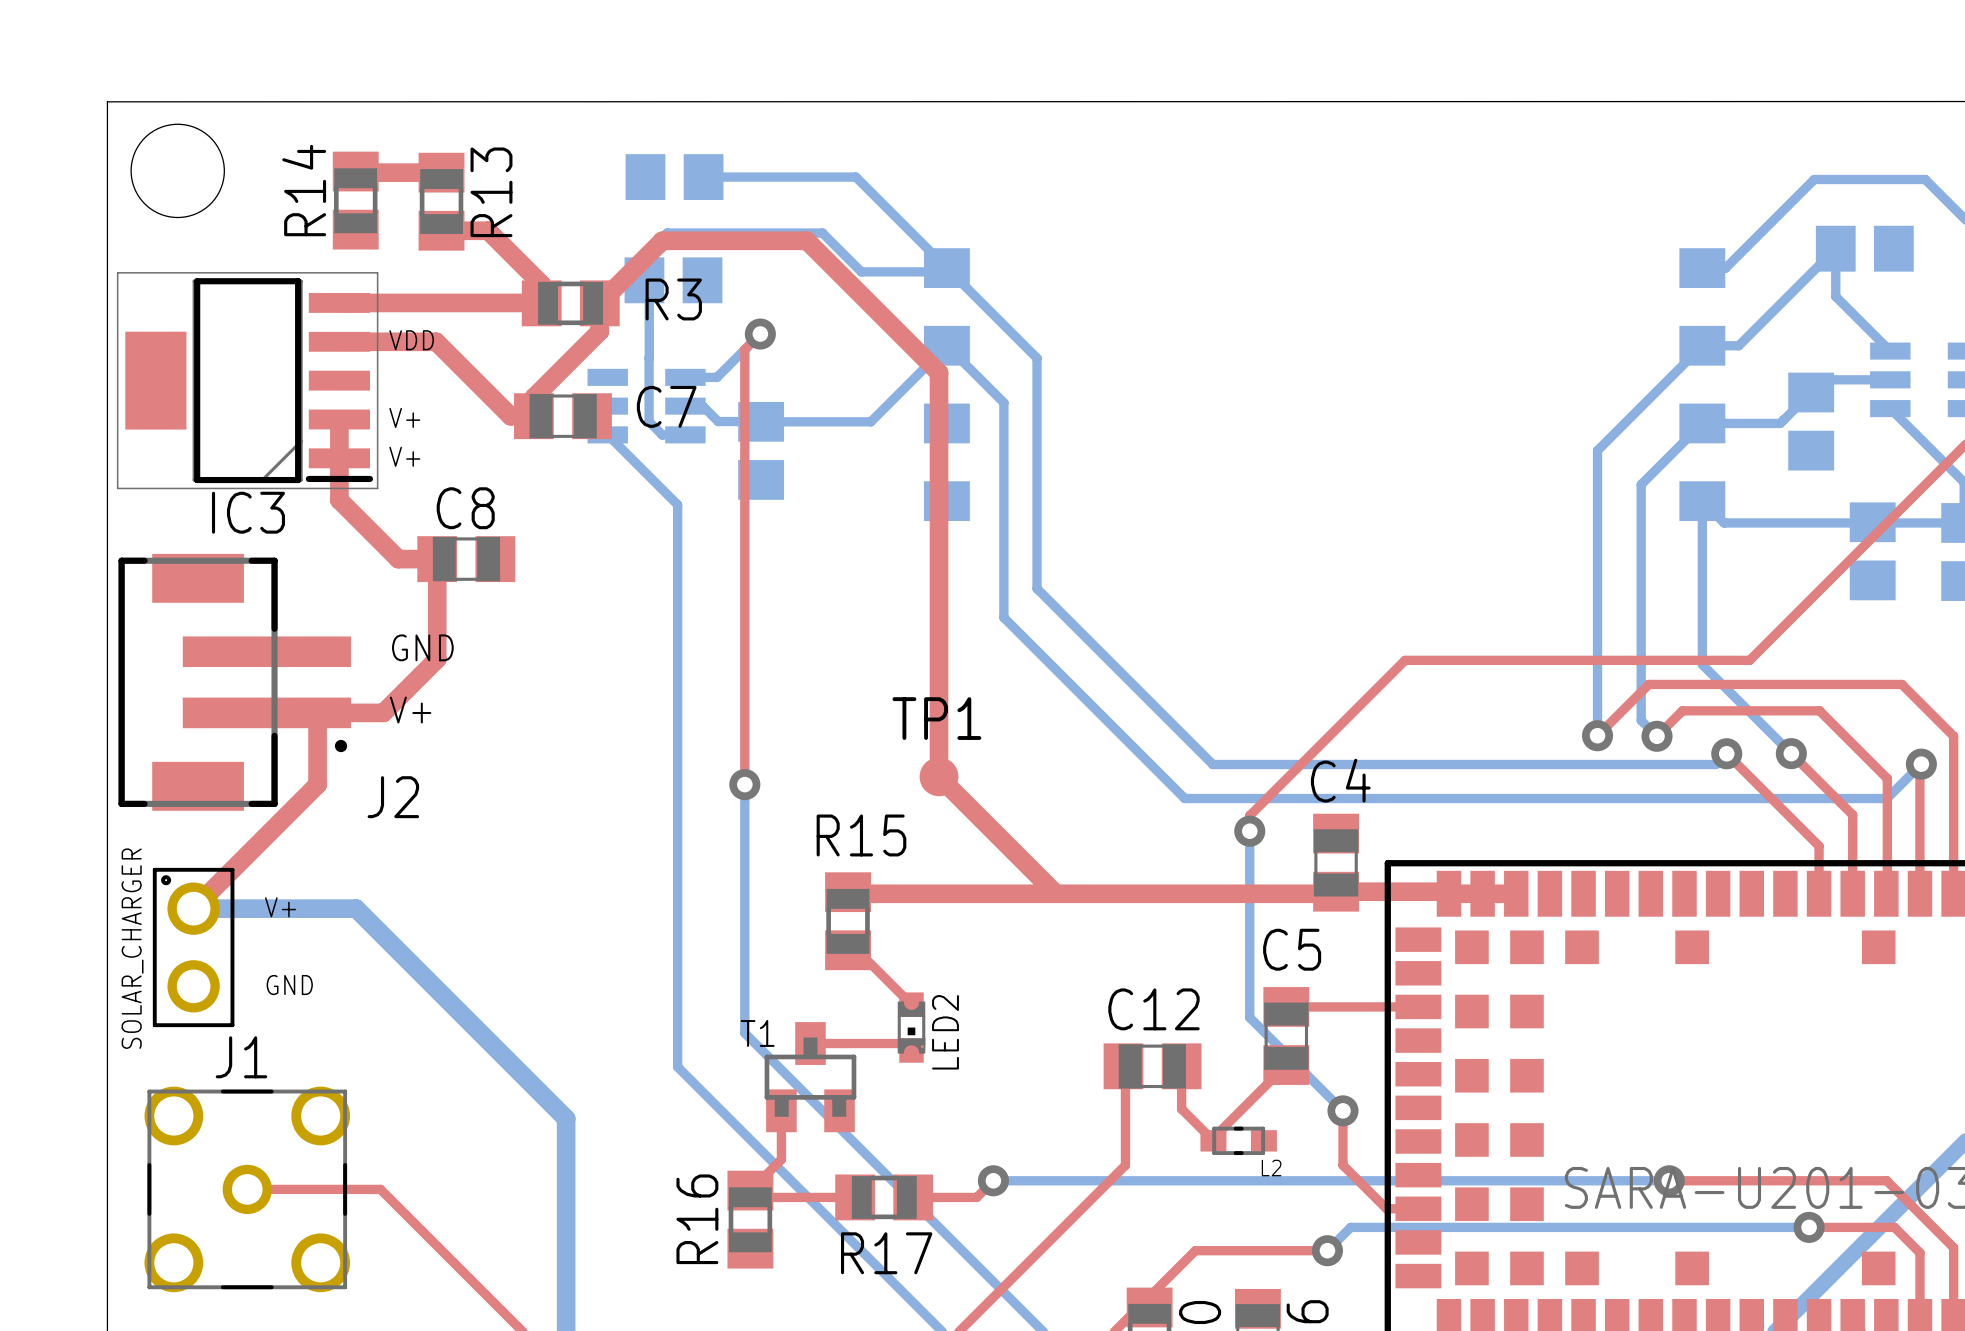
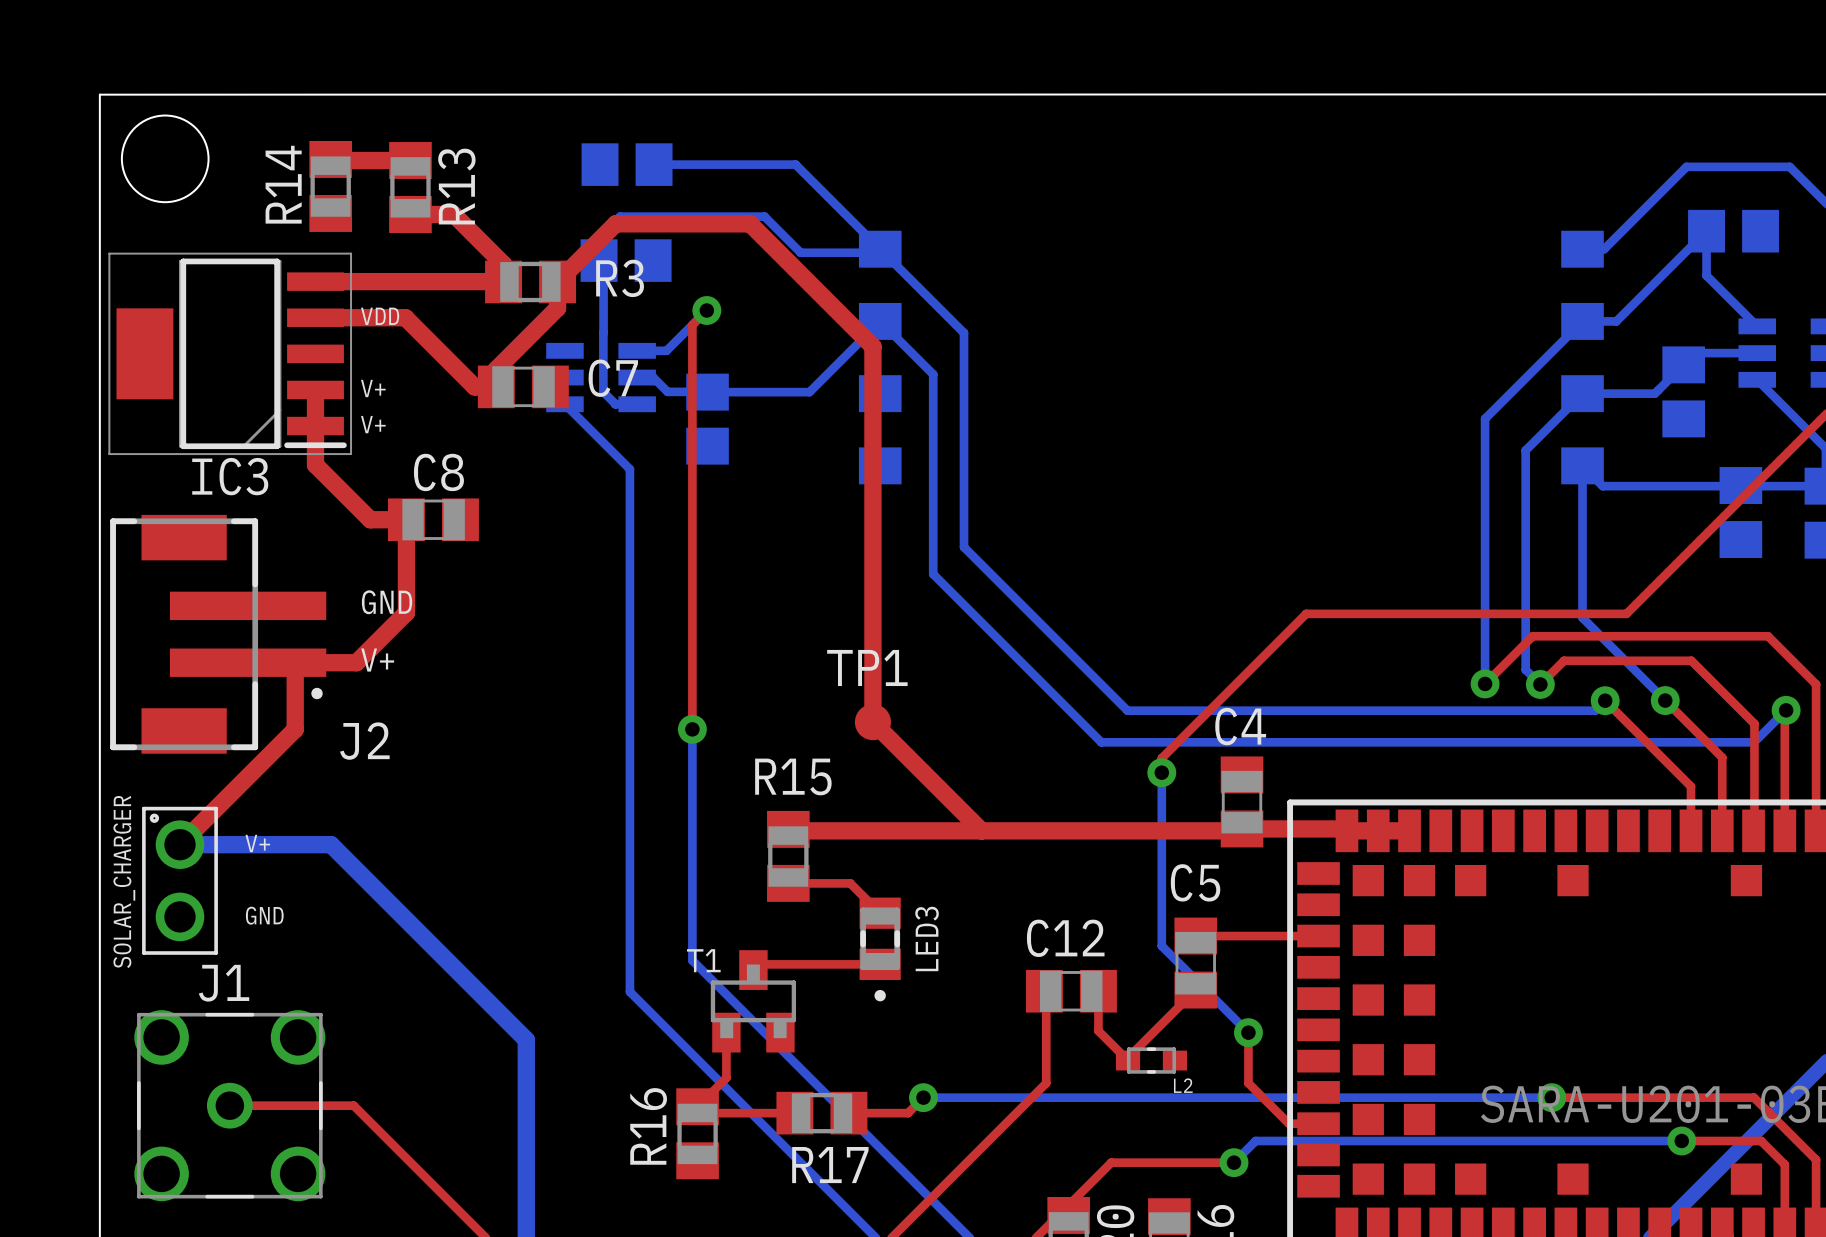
top track: (857, 950) (911, 1004) -> (796, 883) (850, 883) (880, 913)
LED3: none -> (880, 949)
LED2: (911, 1027) -> none
top track: (810, 1043) (903, 1043) (911, 1050) -> (753, 970) (759, 964) (880, 964)

